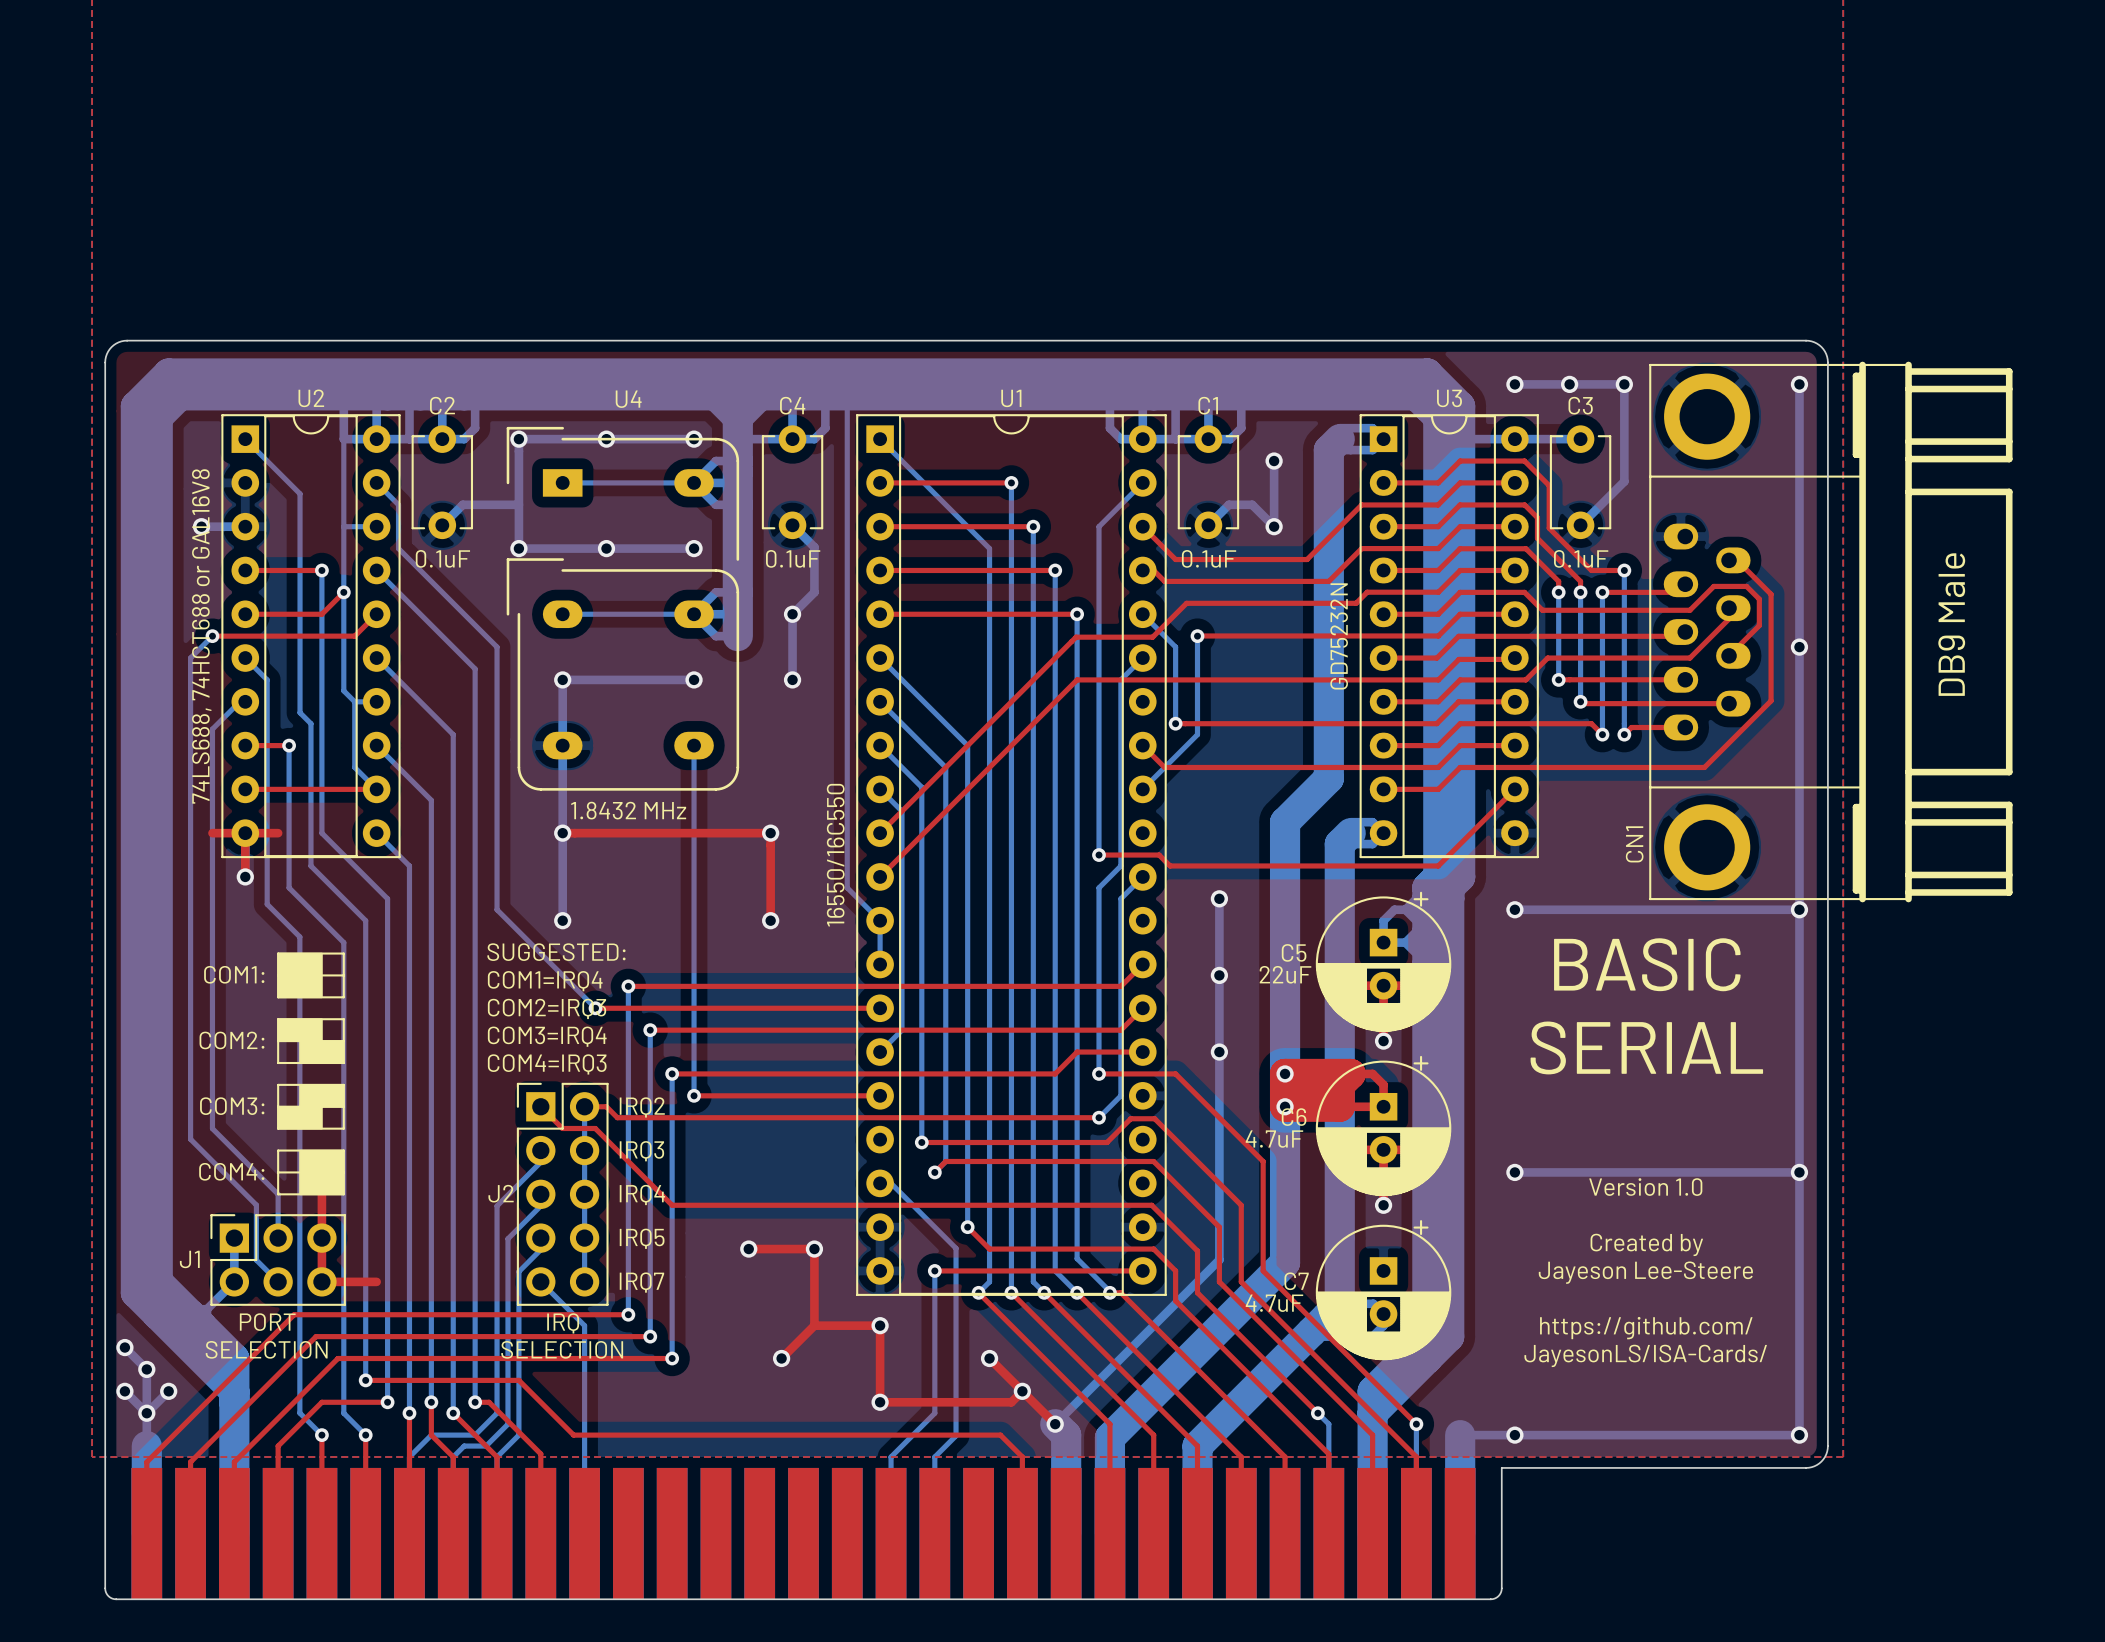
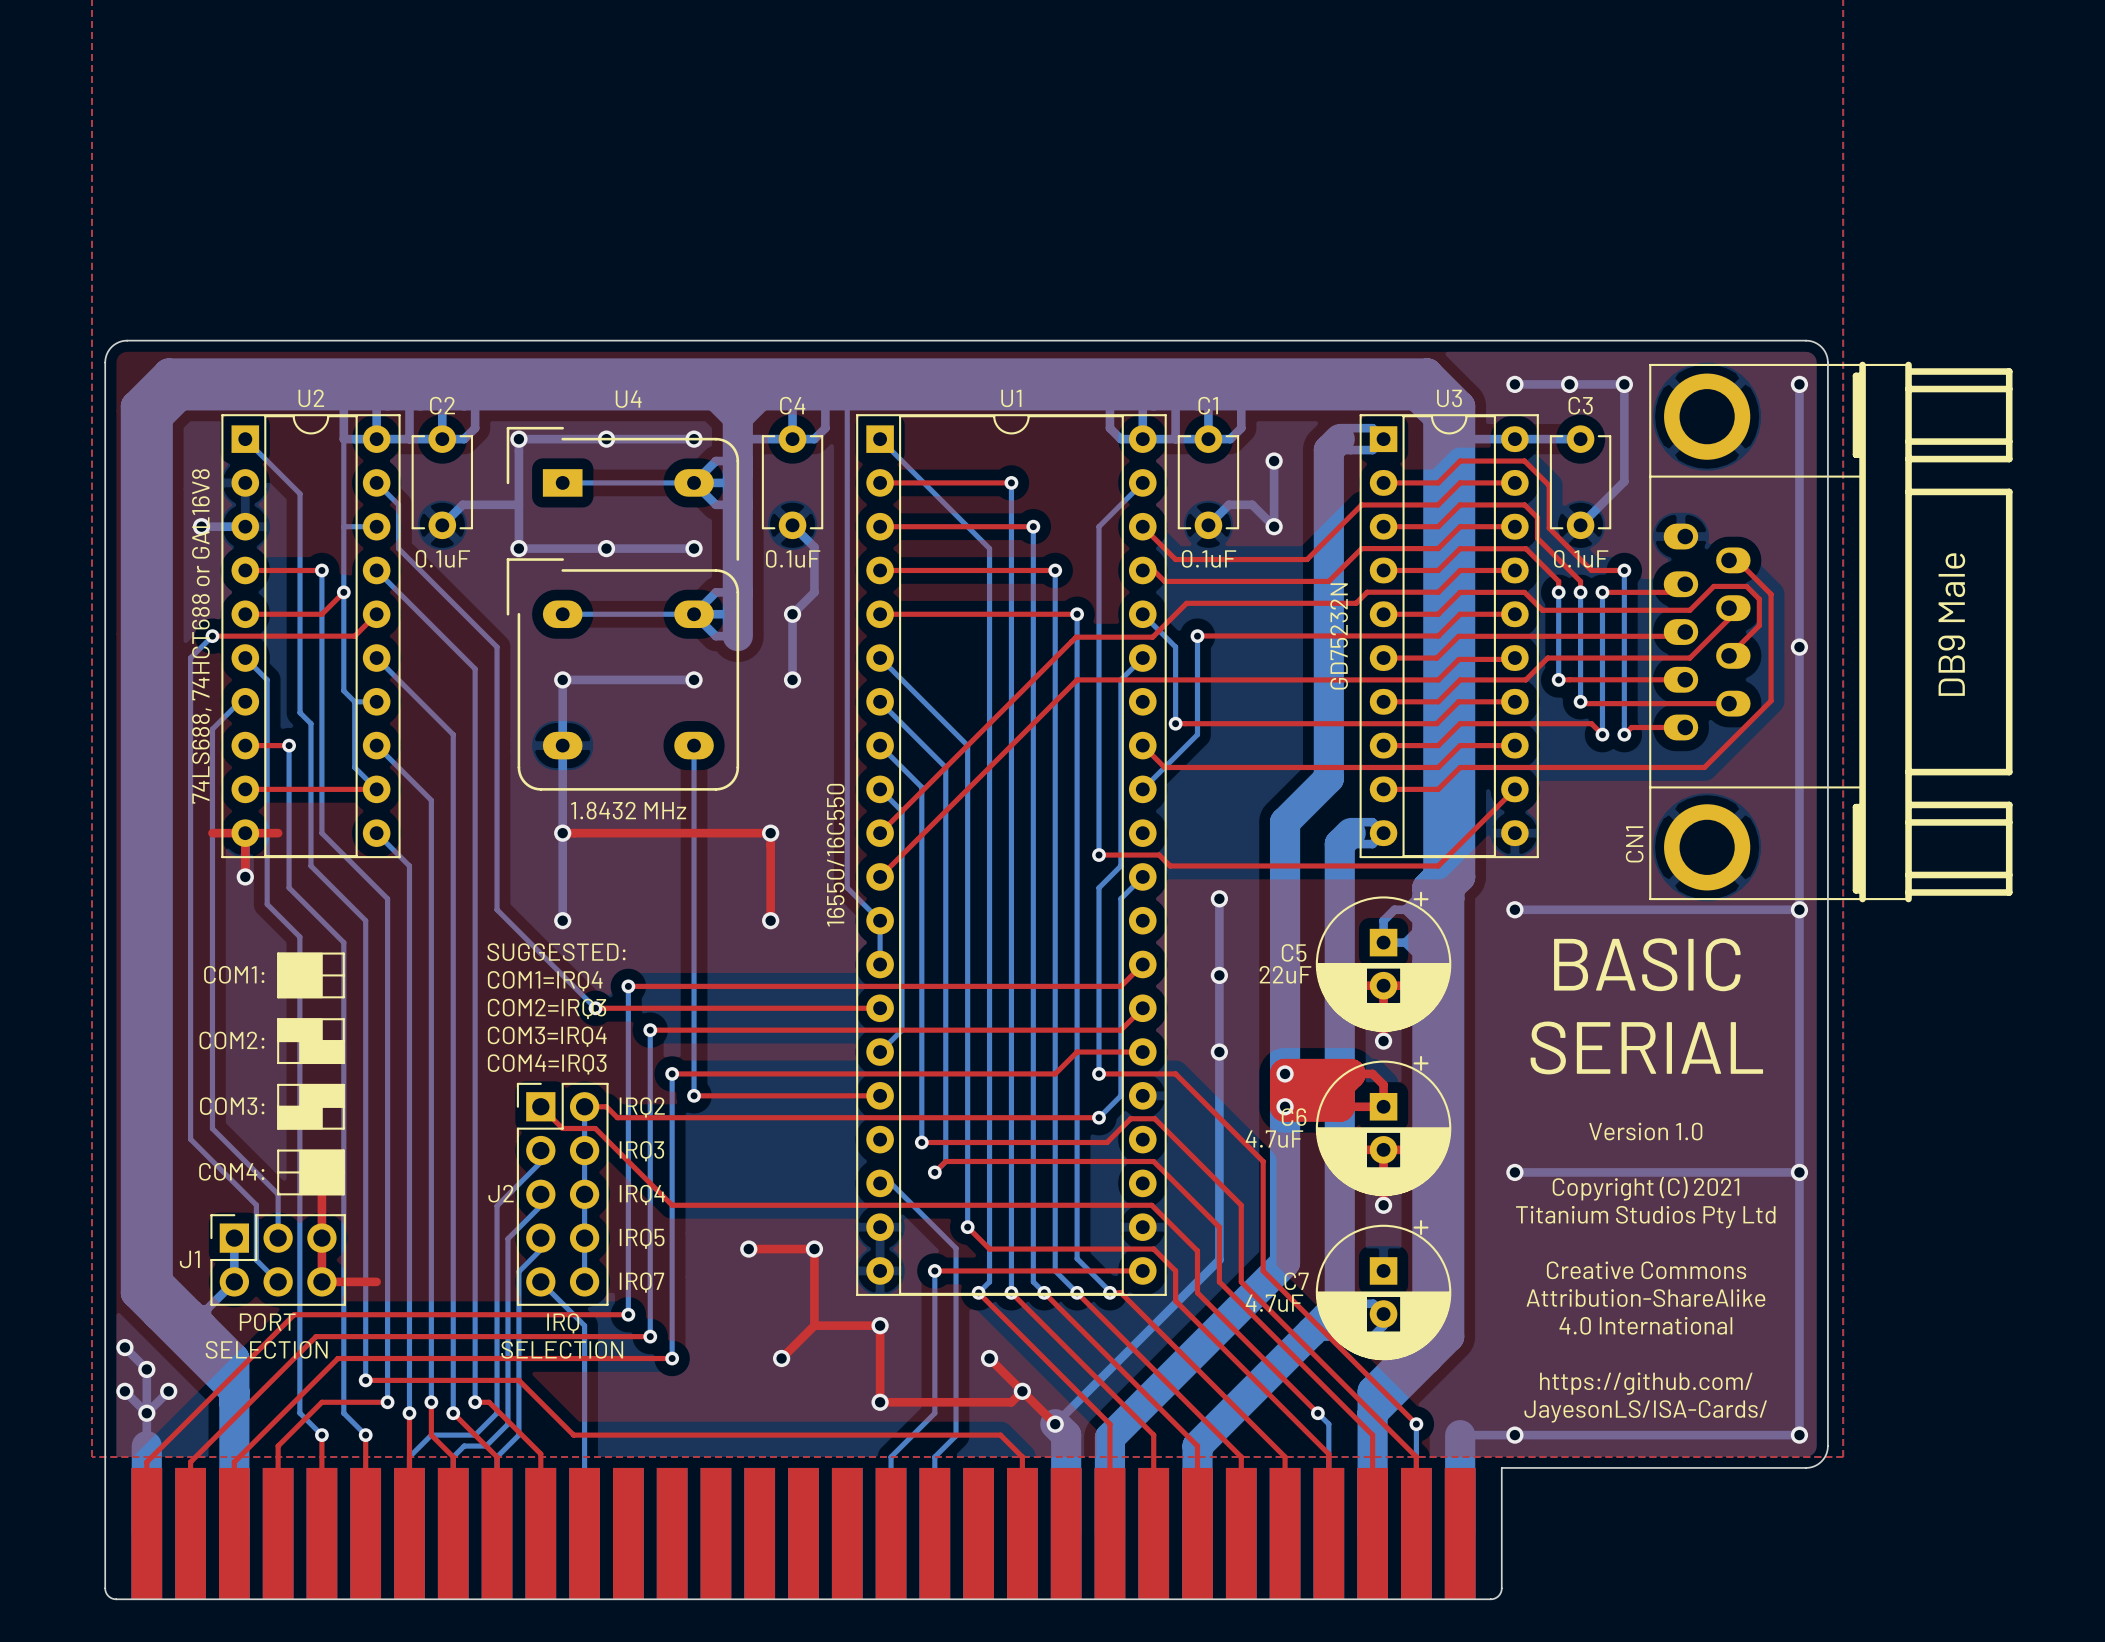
text: none -> Version 1.0 (1645, 1131)
text: Version 1.0 (1645, 1187) -> Copyright (C) 2021 (1645, 1188)
text: none -> Titanium Studios Pty Ltd (1645, 1217)
text: Created by (1646, 1244) -> none
text: Jayeson Lee-Steere (1645, 1272) -> Creative Commons (1646, 1270)
text: none -> Attribution-ShareAlike (1645, 1298)
text: https://github.com/ (1646, 1328) -> 4.0 International (1645, 1325)
text position: JayesonLS/ISA-Cards/ (1645, 1355) -> JayesonLS/ISA-Cards/ (1645, 1411)
text: none -> https://github.com/ (1646, 1383)

